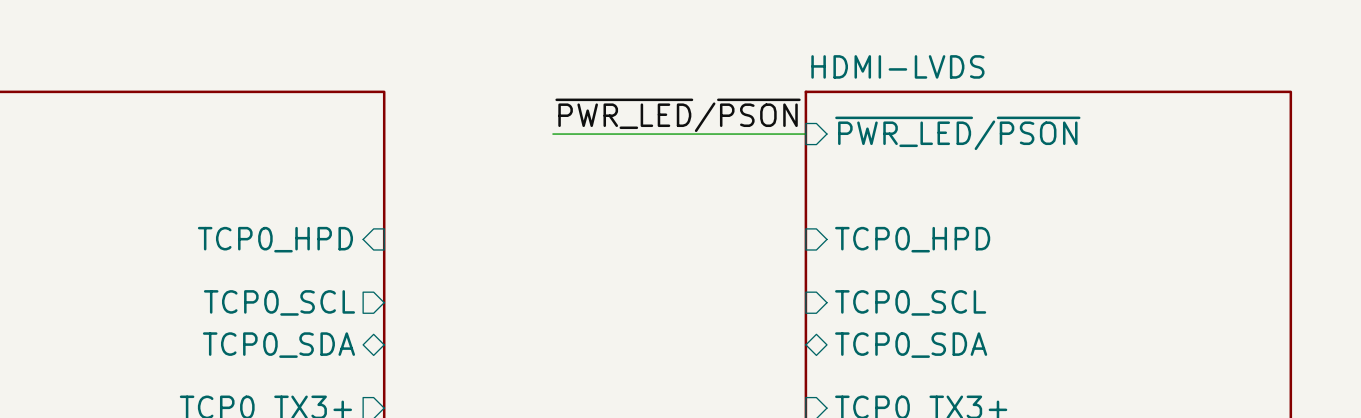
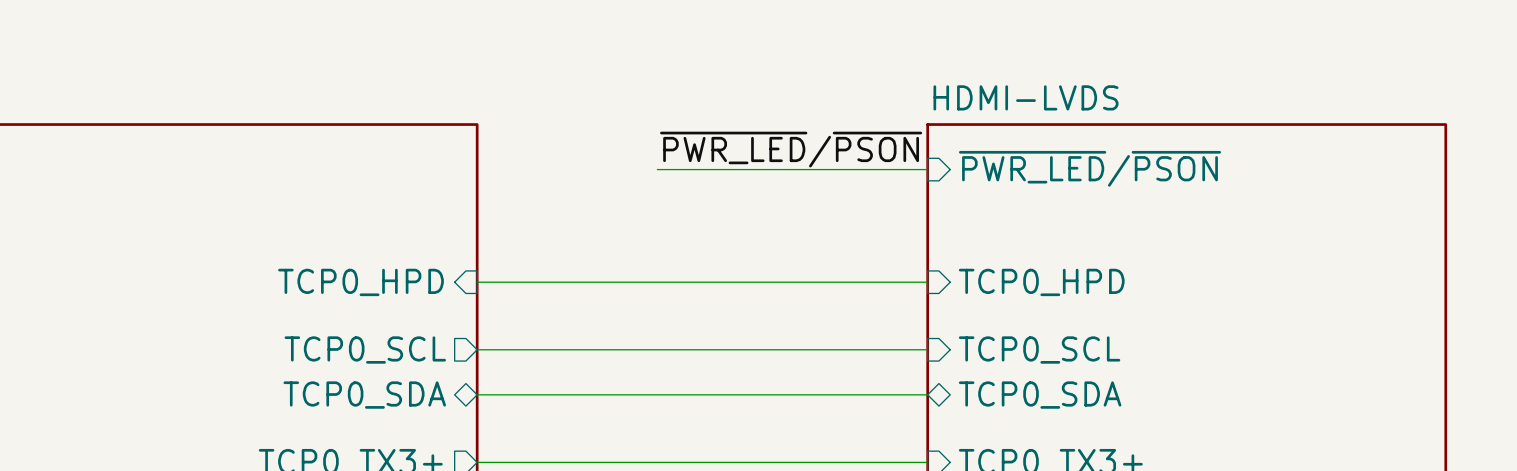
wire: none -> (477, 282) (927, 282)
wire: none -> (477, 349) (927, 349)
wire: none -> (477, 394) (927, 394)
wire: none -> (477, 462) (927, 462)

